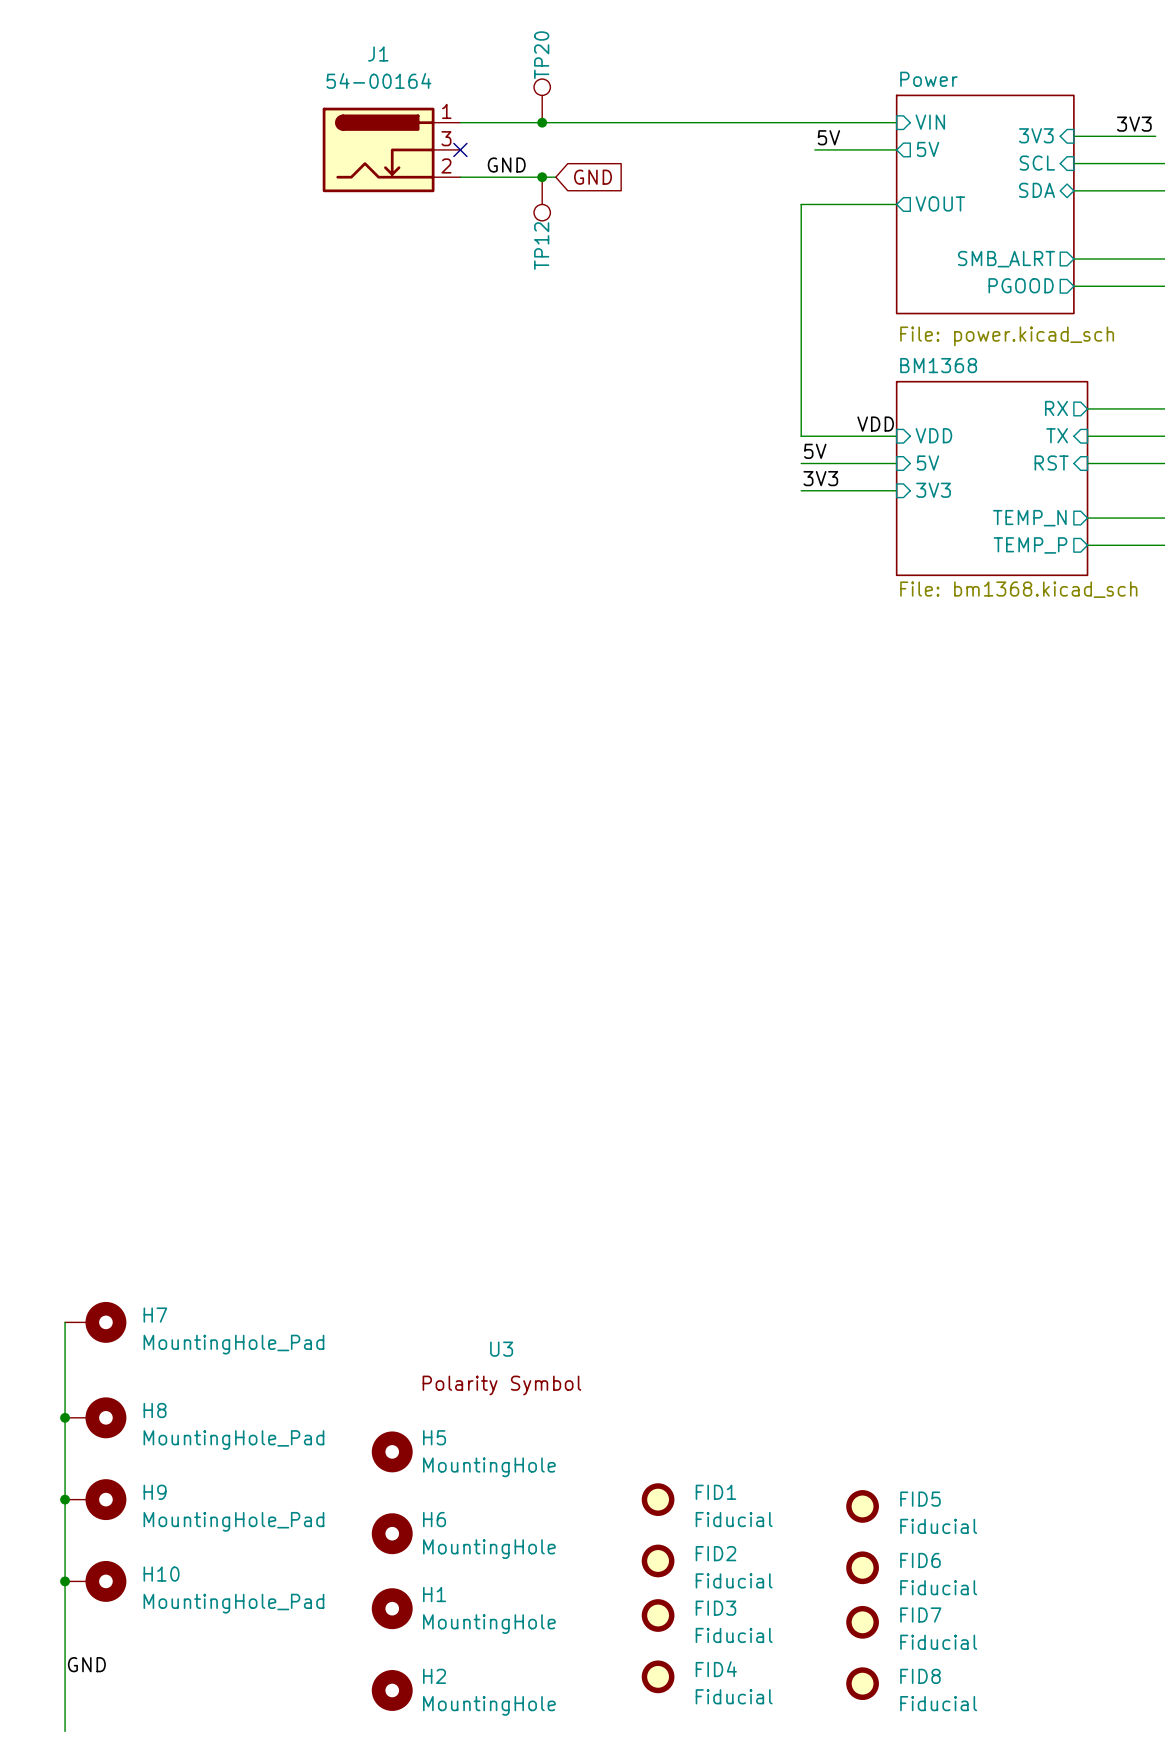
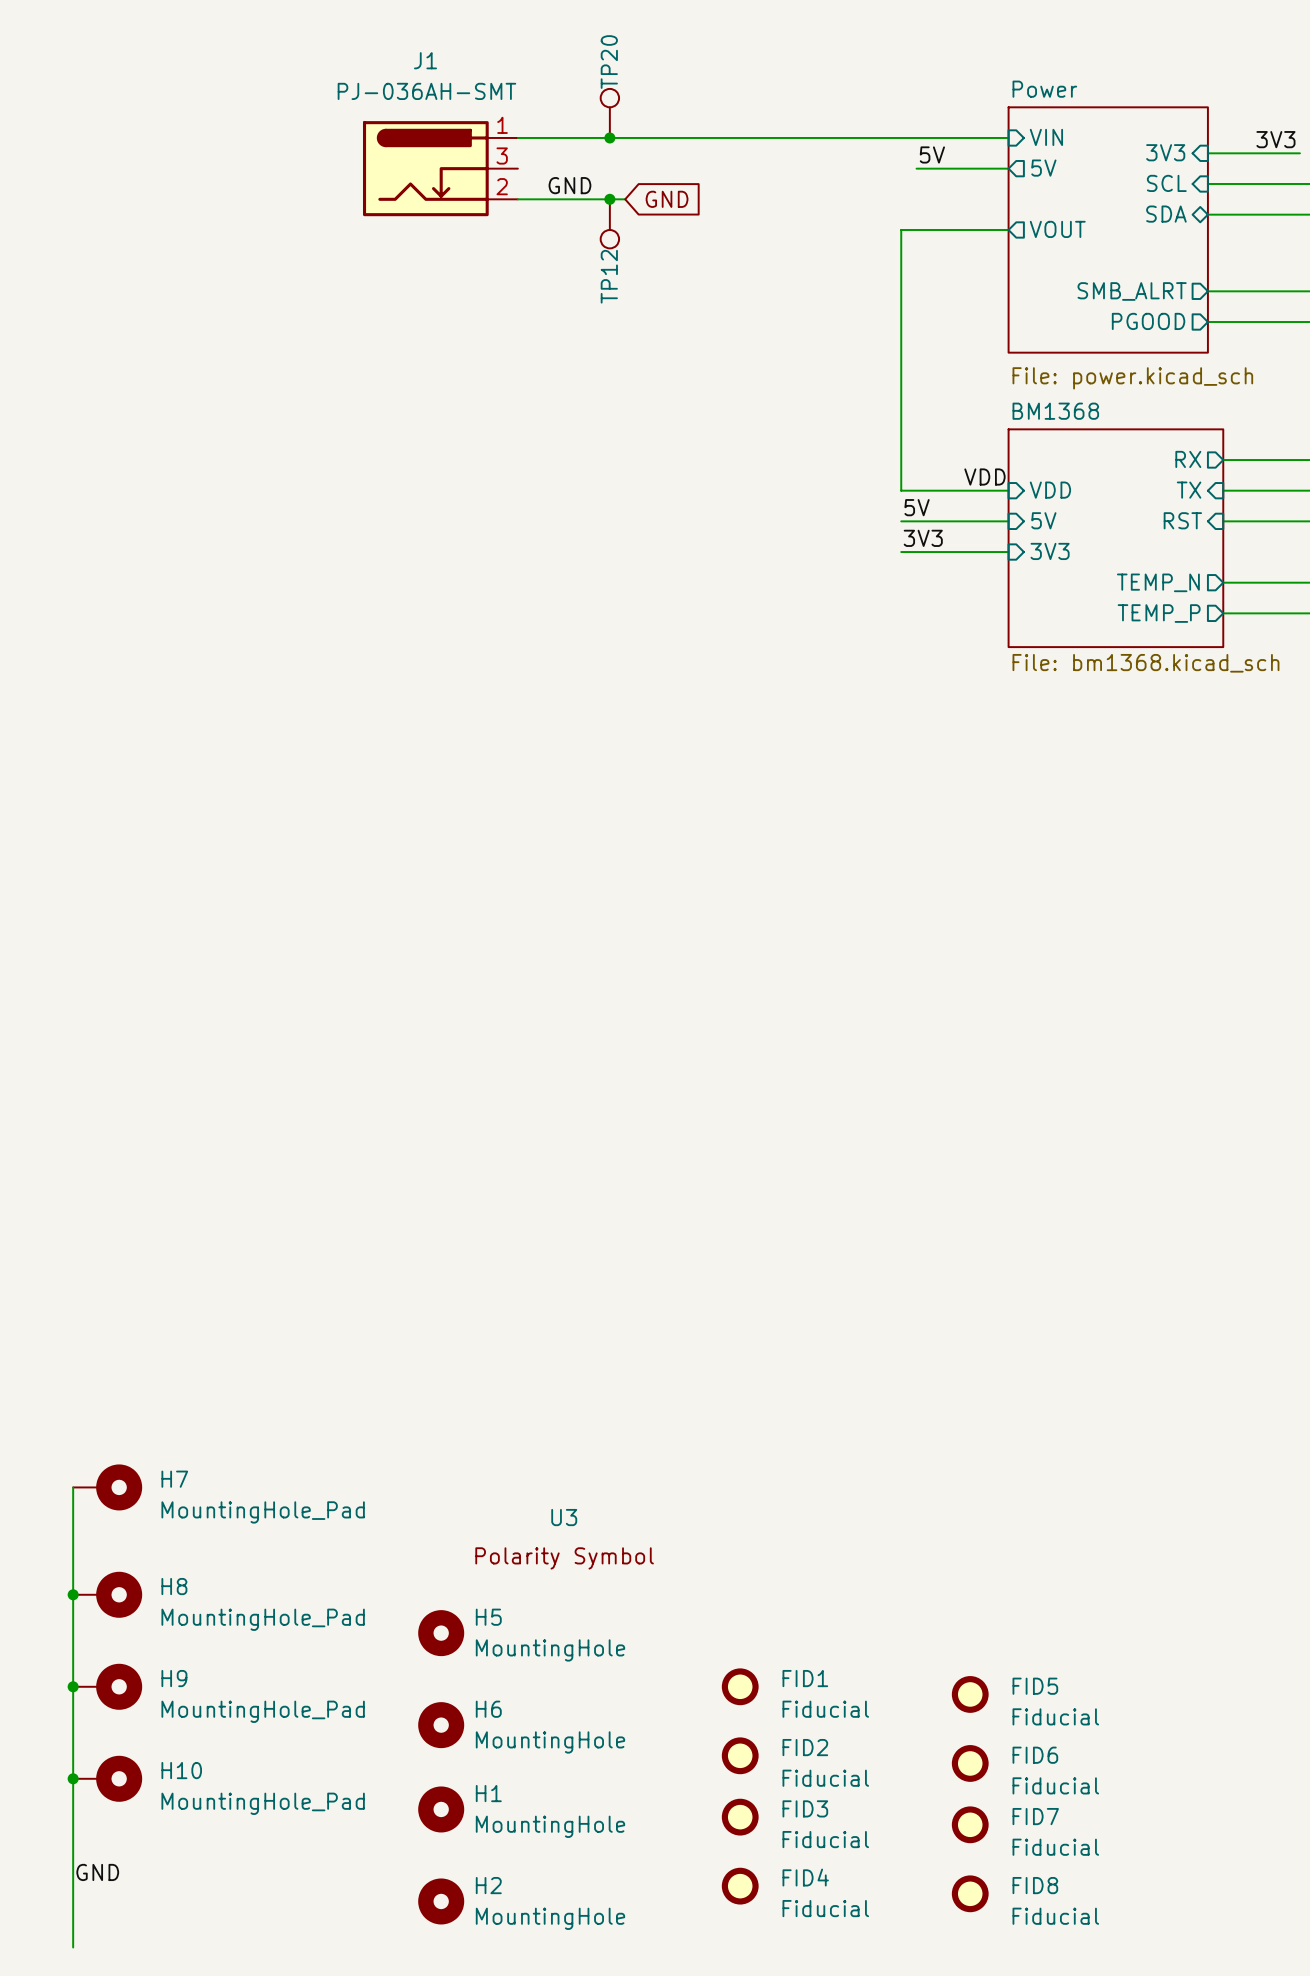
J1 value: 54-00164 (378, 80) -> PJ-036AH-SMT (426, 91)
no-connect mark: (460, 149) -> none

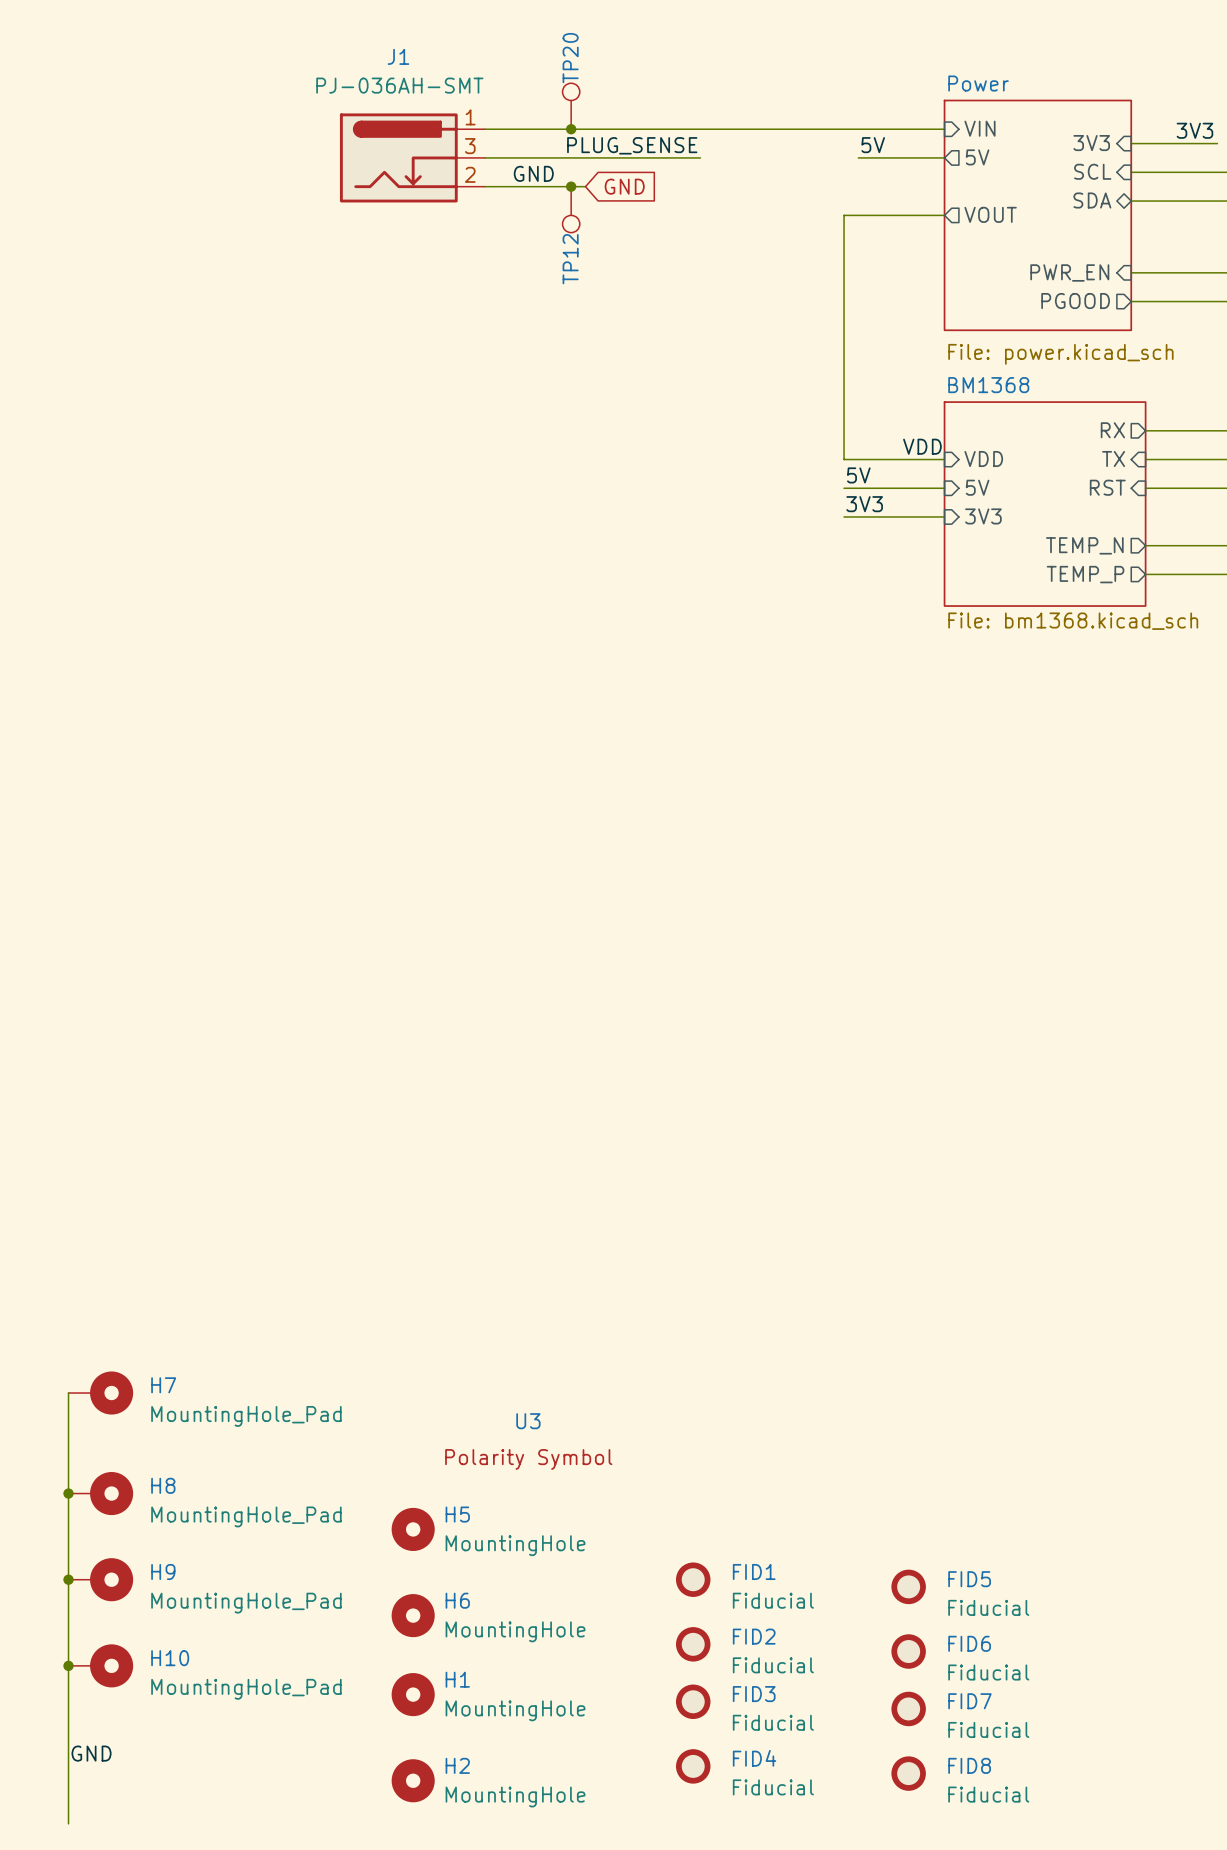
label: none -> PLUG_SENSE (632, 145)
wire: none -> (484, 157) (700, 157)
sheet pin shape: output (1132, 291) -> input (1069, 272)
sheet pin: SMB_ALRT (1132, 291) -> PWR_EN (1069, 272)

